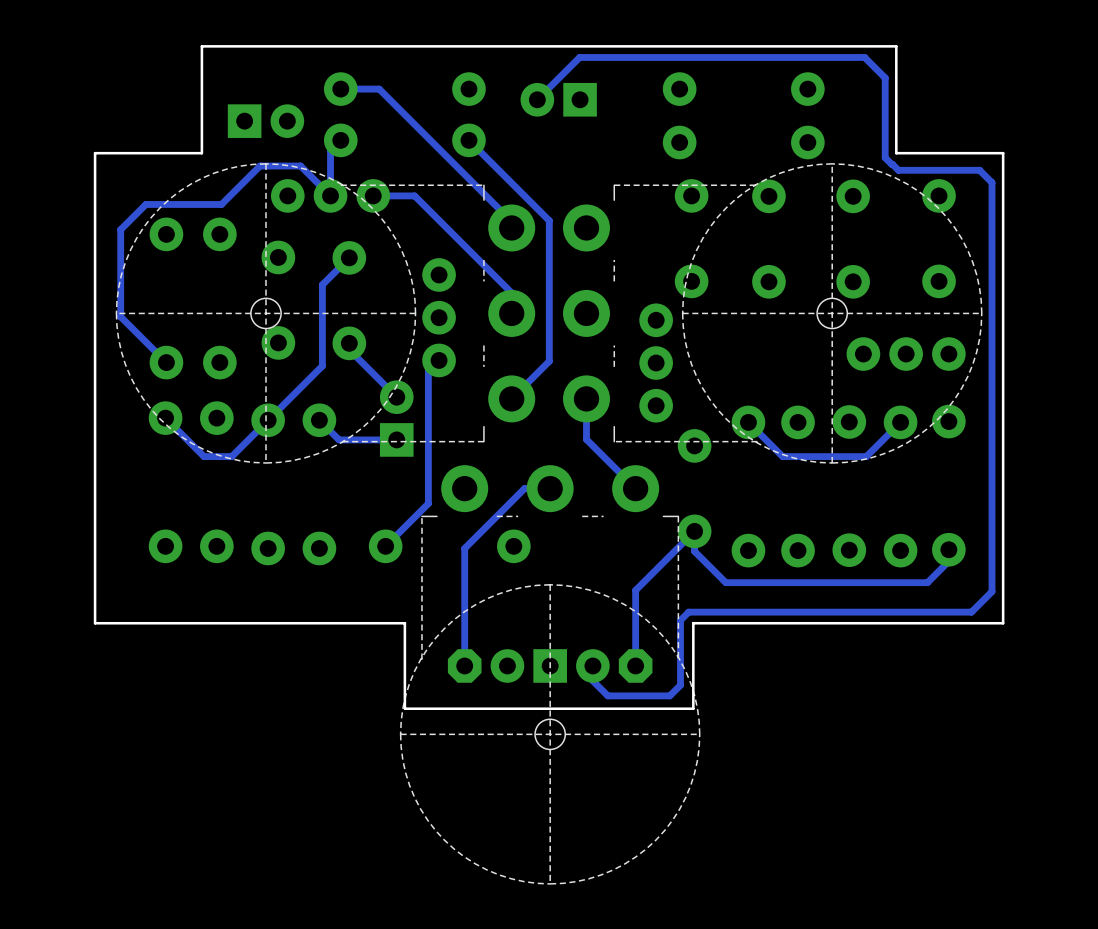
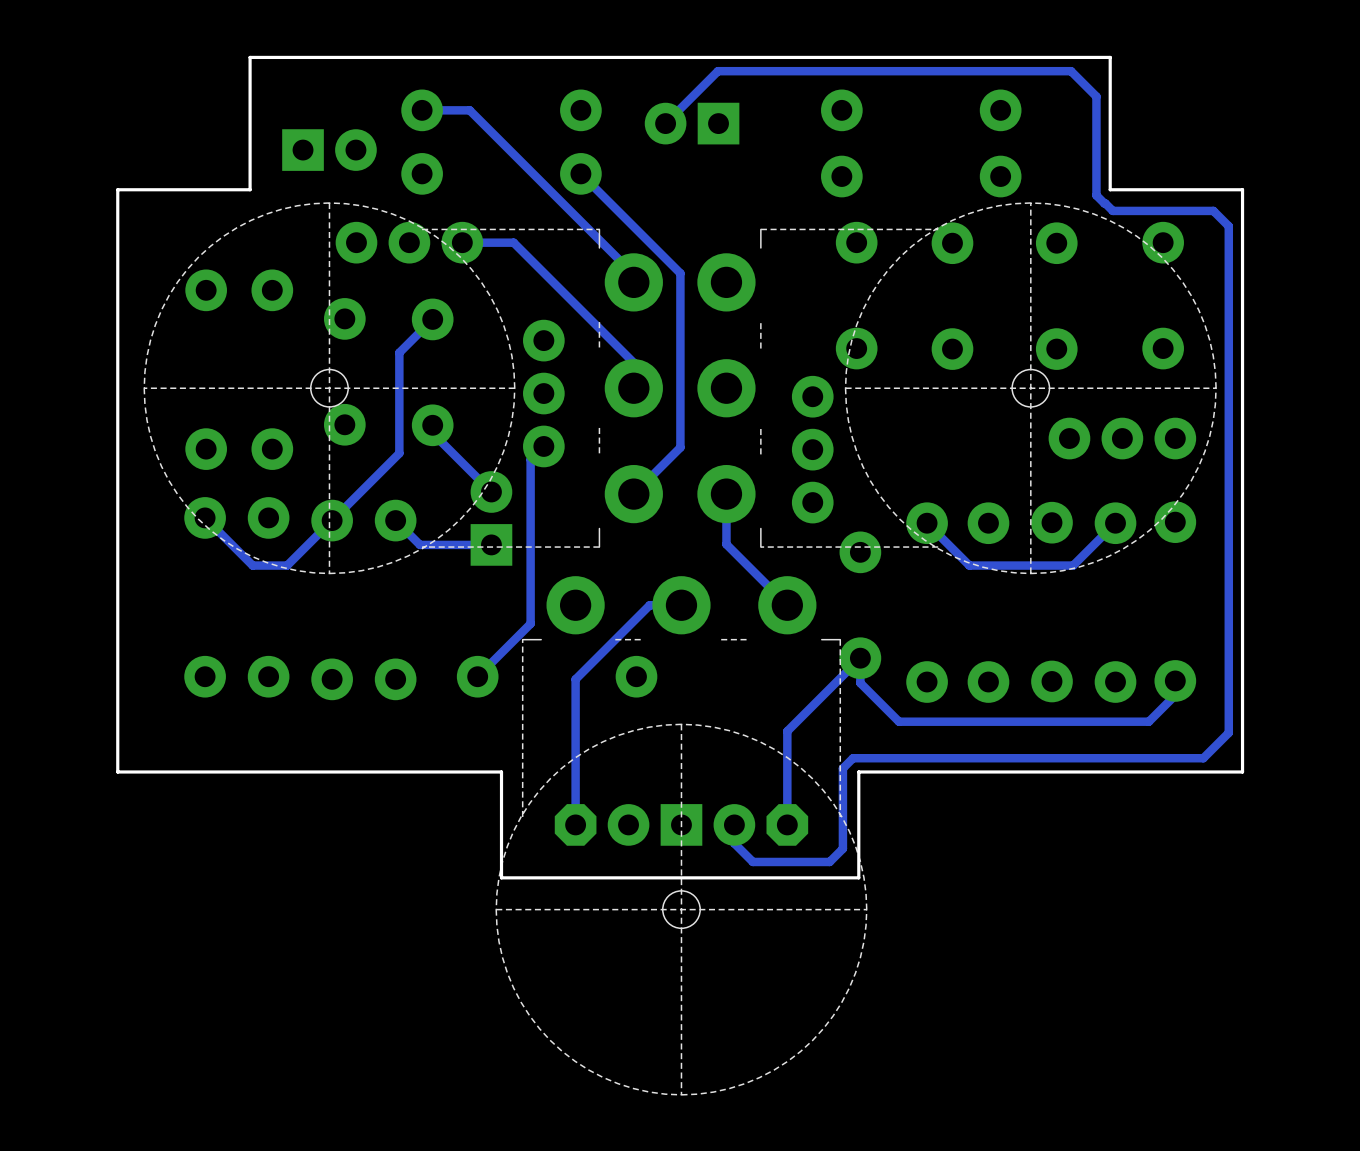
track: (340, 140) (330, 150) (330, 195) (300, 166) (260, 166) (221, 204) (145, 204) (120, 229) (120, 316) (166, 362) -> none

